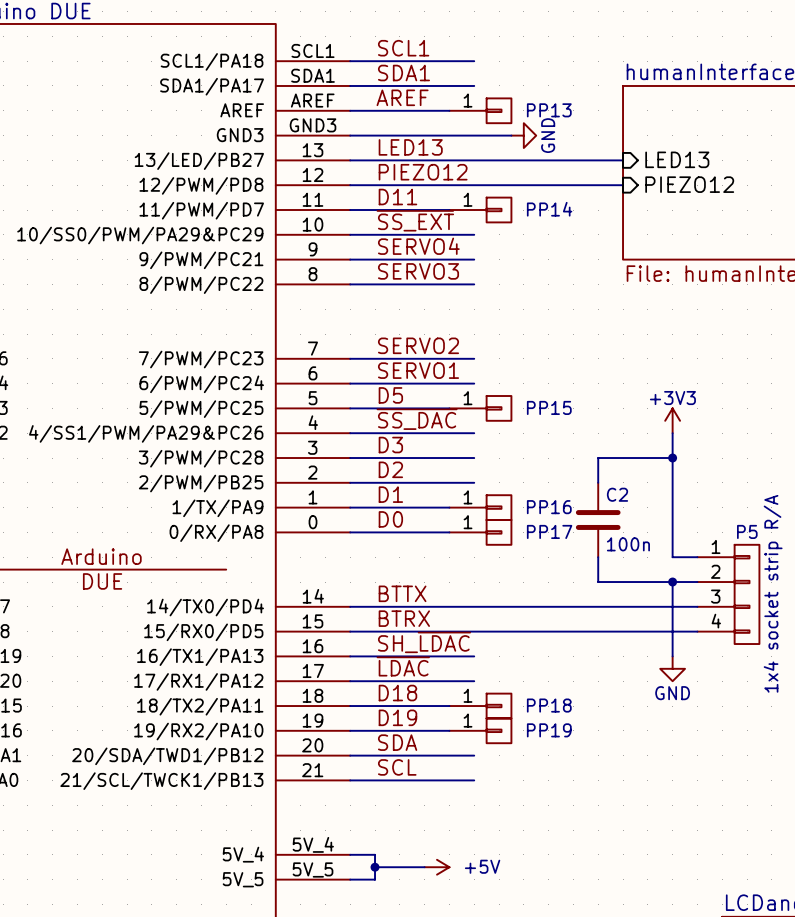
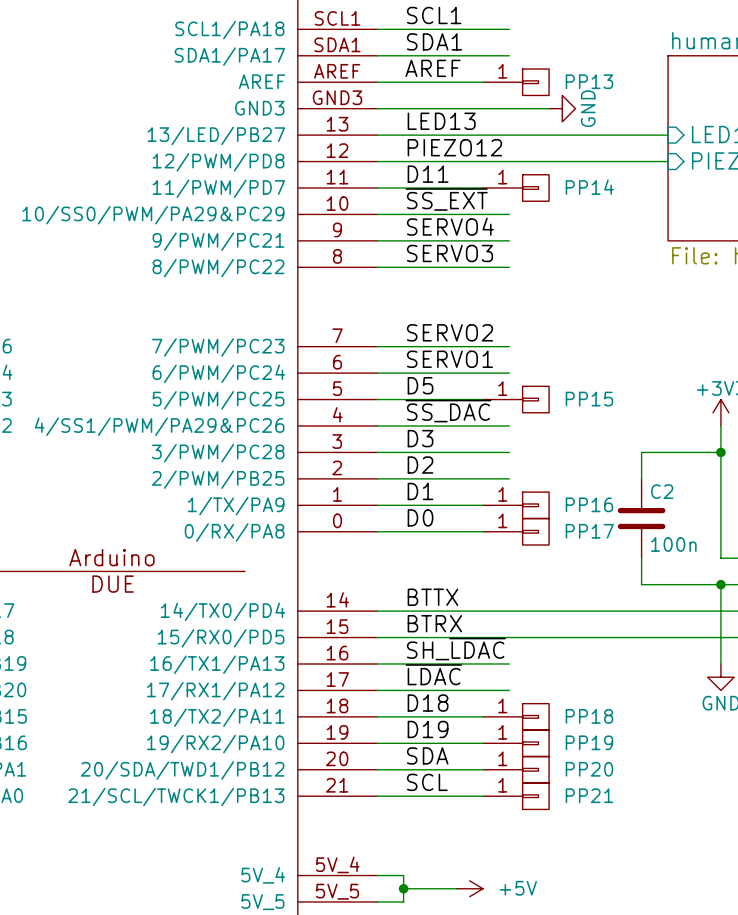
PP20: none -> (515, 769)
PP21: none -> (515, 796)

